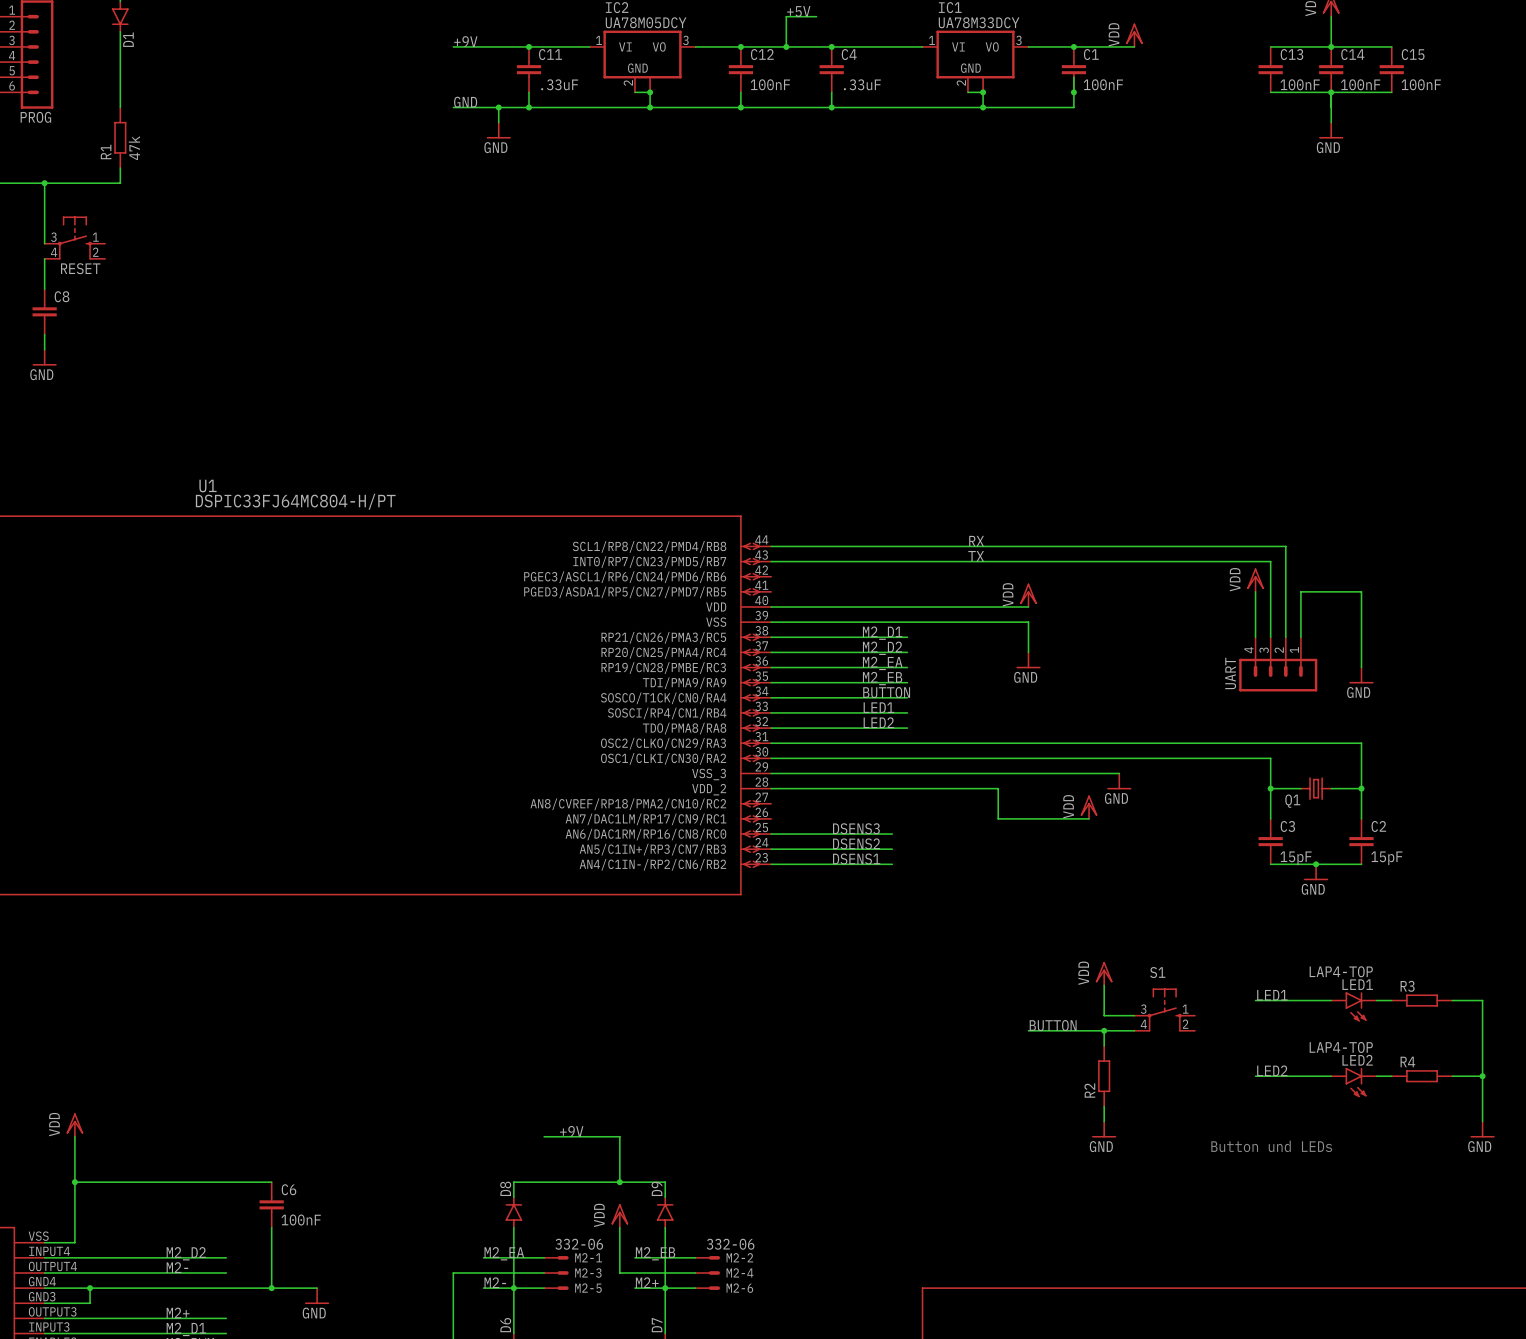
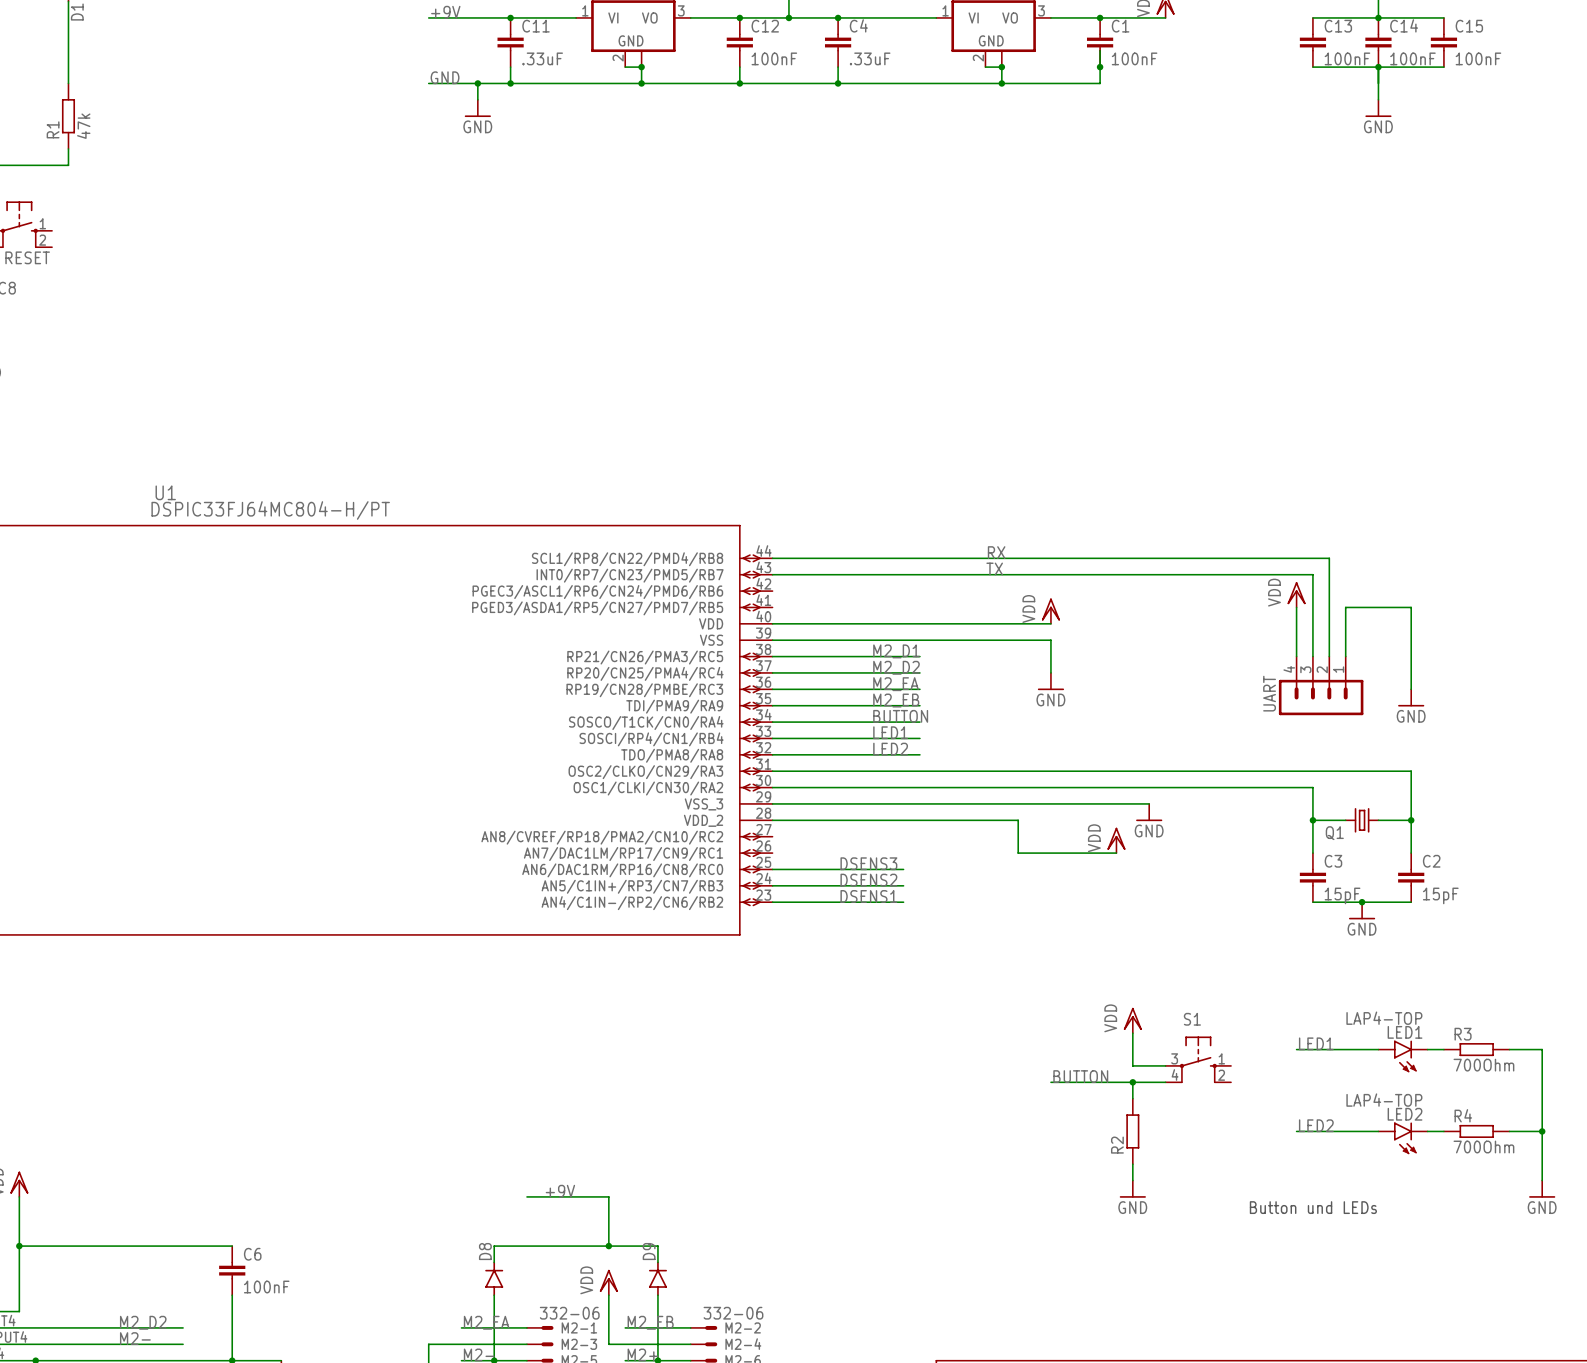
R3 value: none -> 700Ohm (1483, 1065)
R4 value: none -> 700Ohm (1483, 1147)

